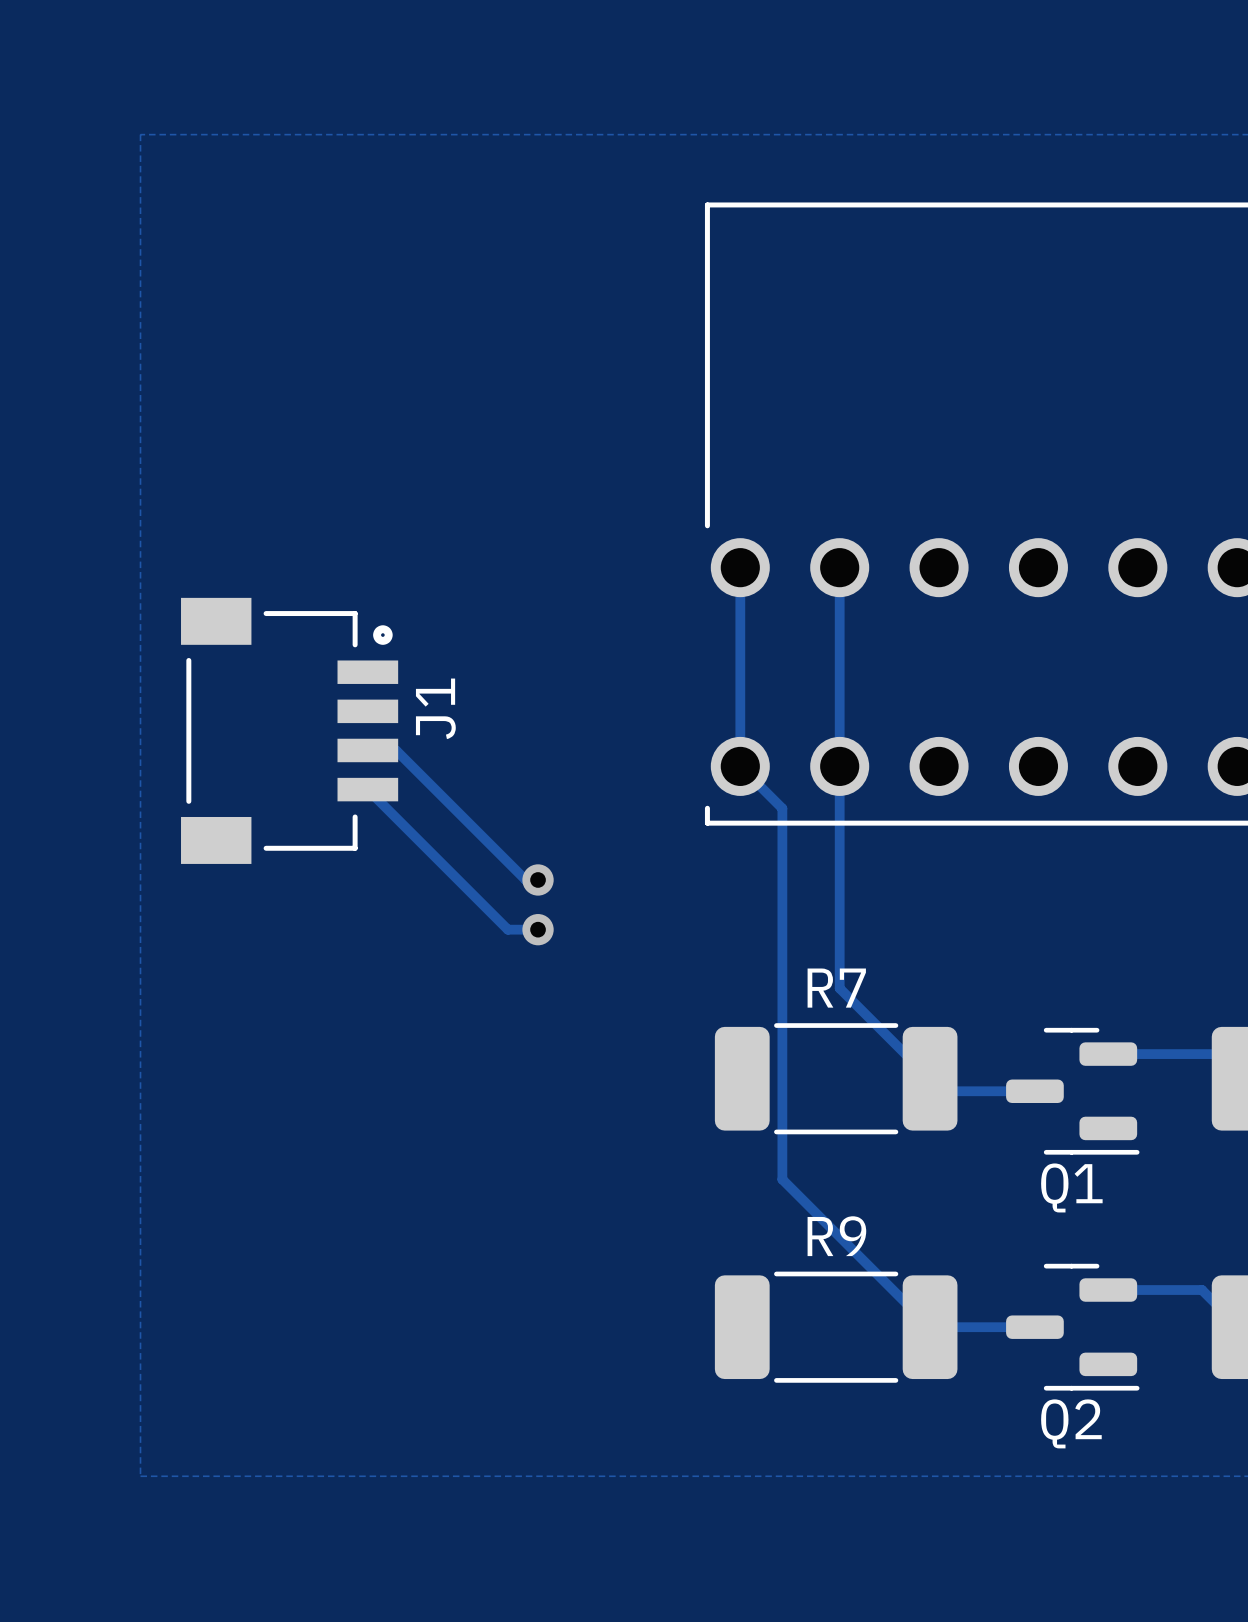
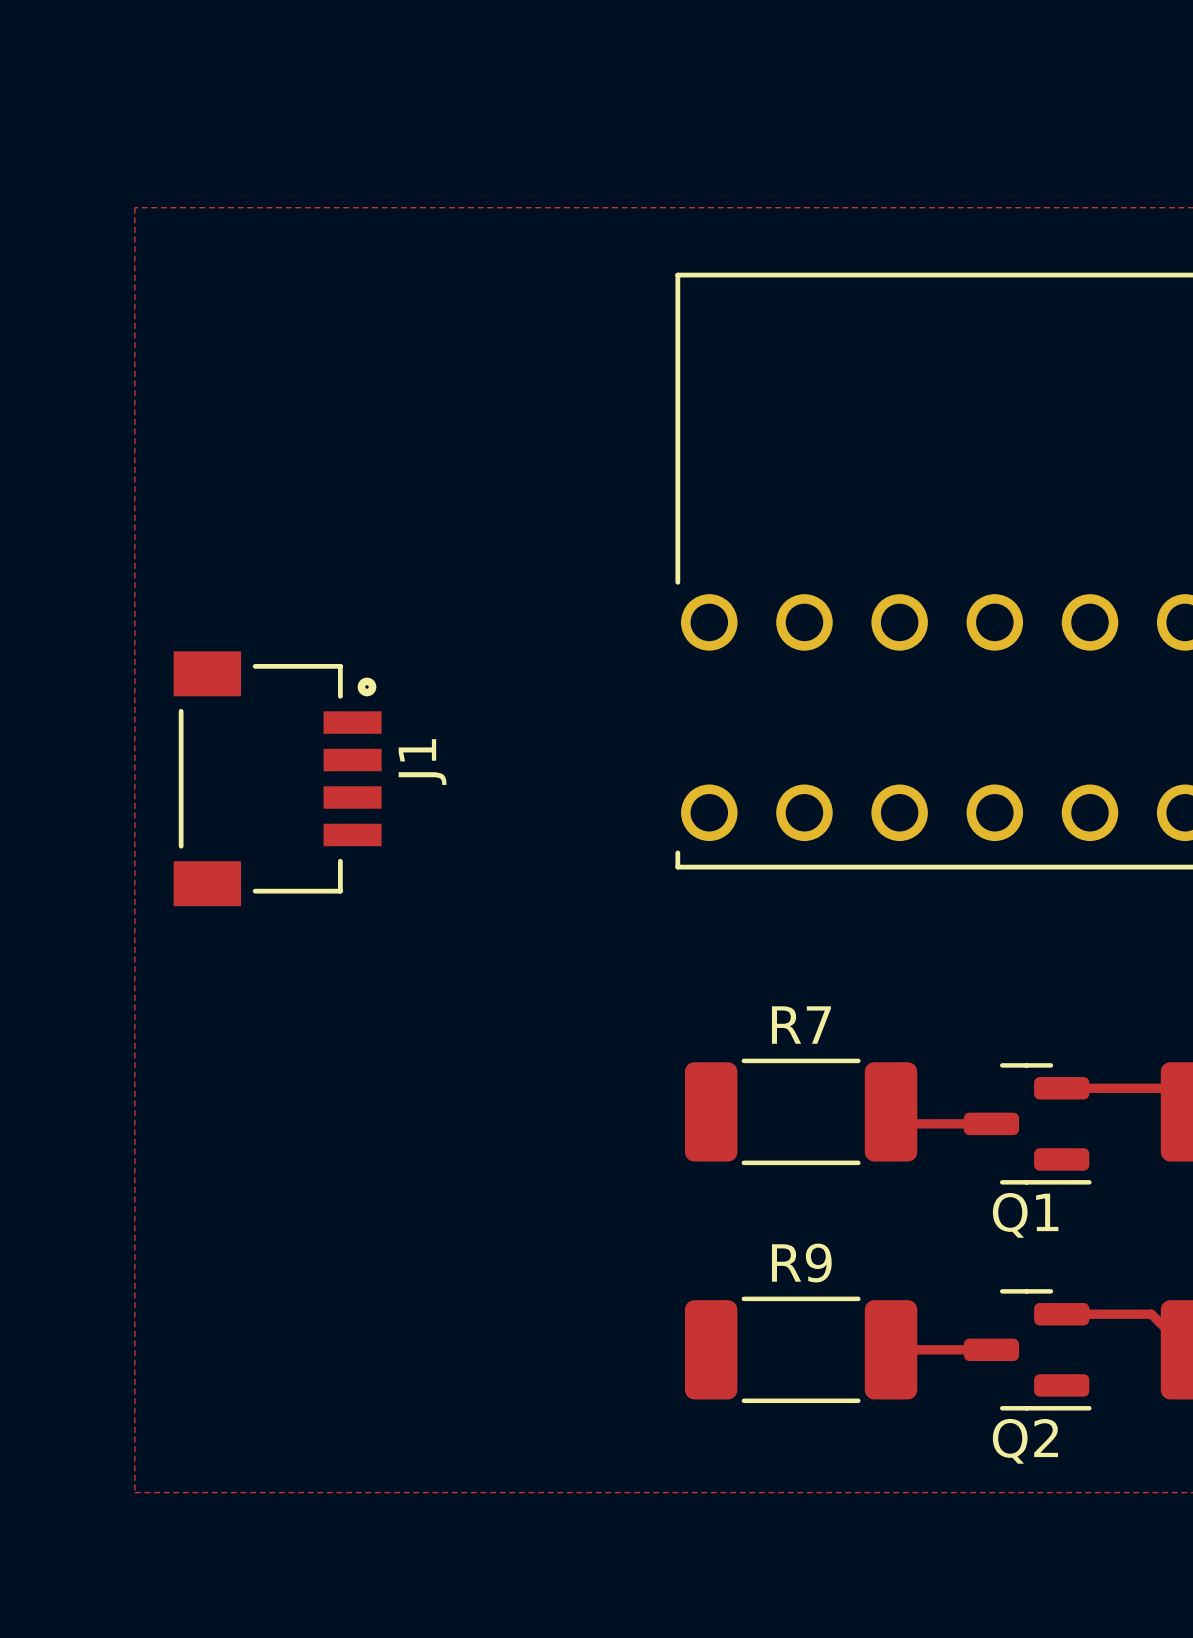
track: (740, 567) (740, 766) (782, 808) (782, 1179) (930, 1327) -> none
track: (839, 567) (839, 988) (930, 1078) -> none
track: (367, 750) (396, 750) (525, 879) (538, 879) -> none
track: (367, 789) (507, 929) (538, 929) -> none
via: (538, 879) -> none
via: (538, 929) -> none

